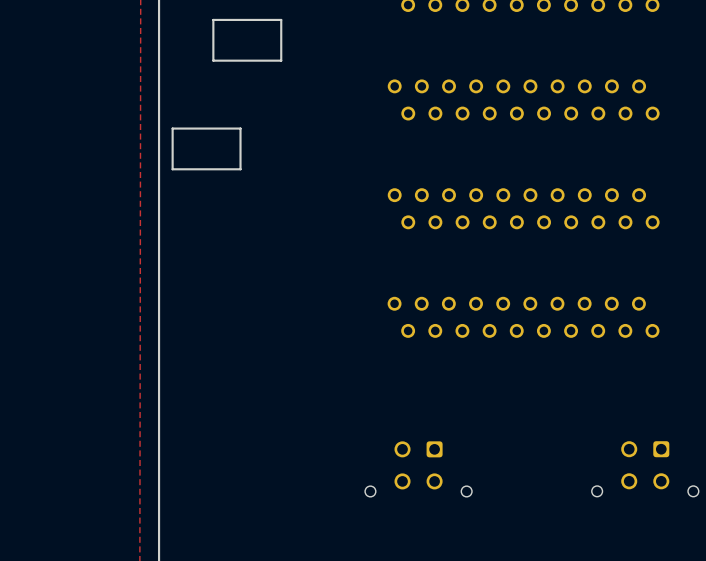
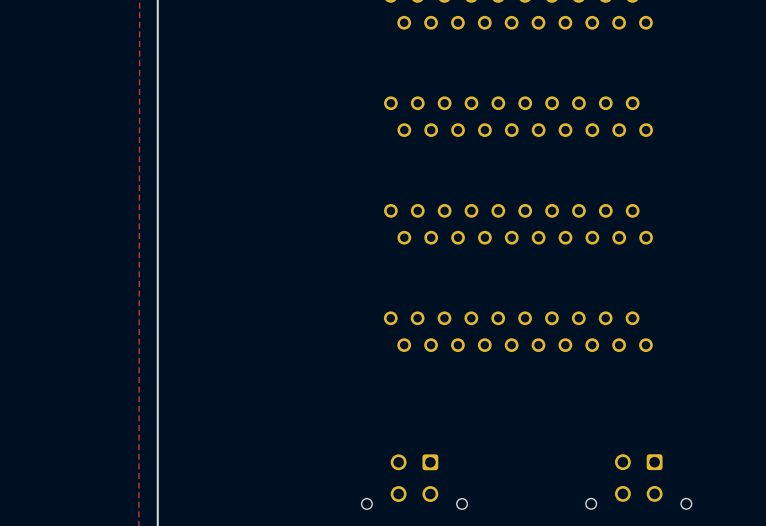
board edge: (281, 19) (281, 60) (213, 60) (213, 19) (281, 19) -> none
board edge: (240, 128) (240, 169) (172, 169) (172, 128) (240, 128) -> none

